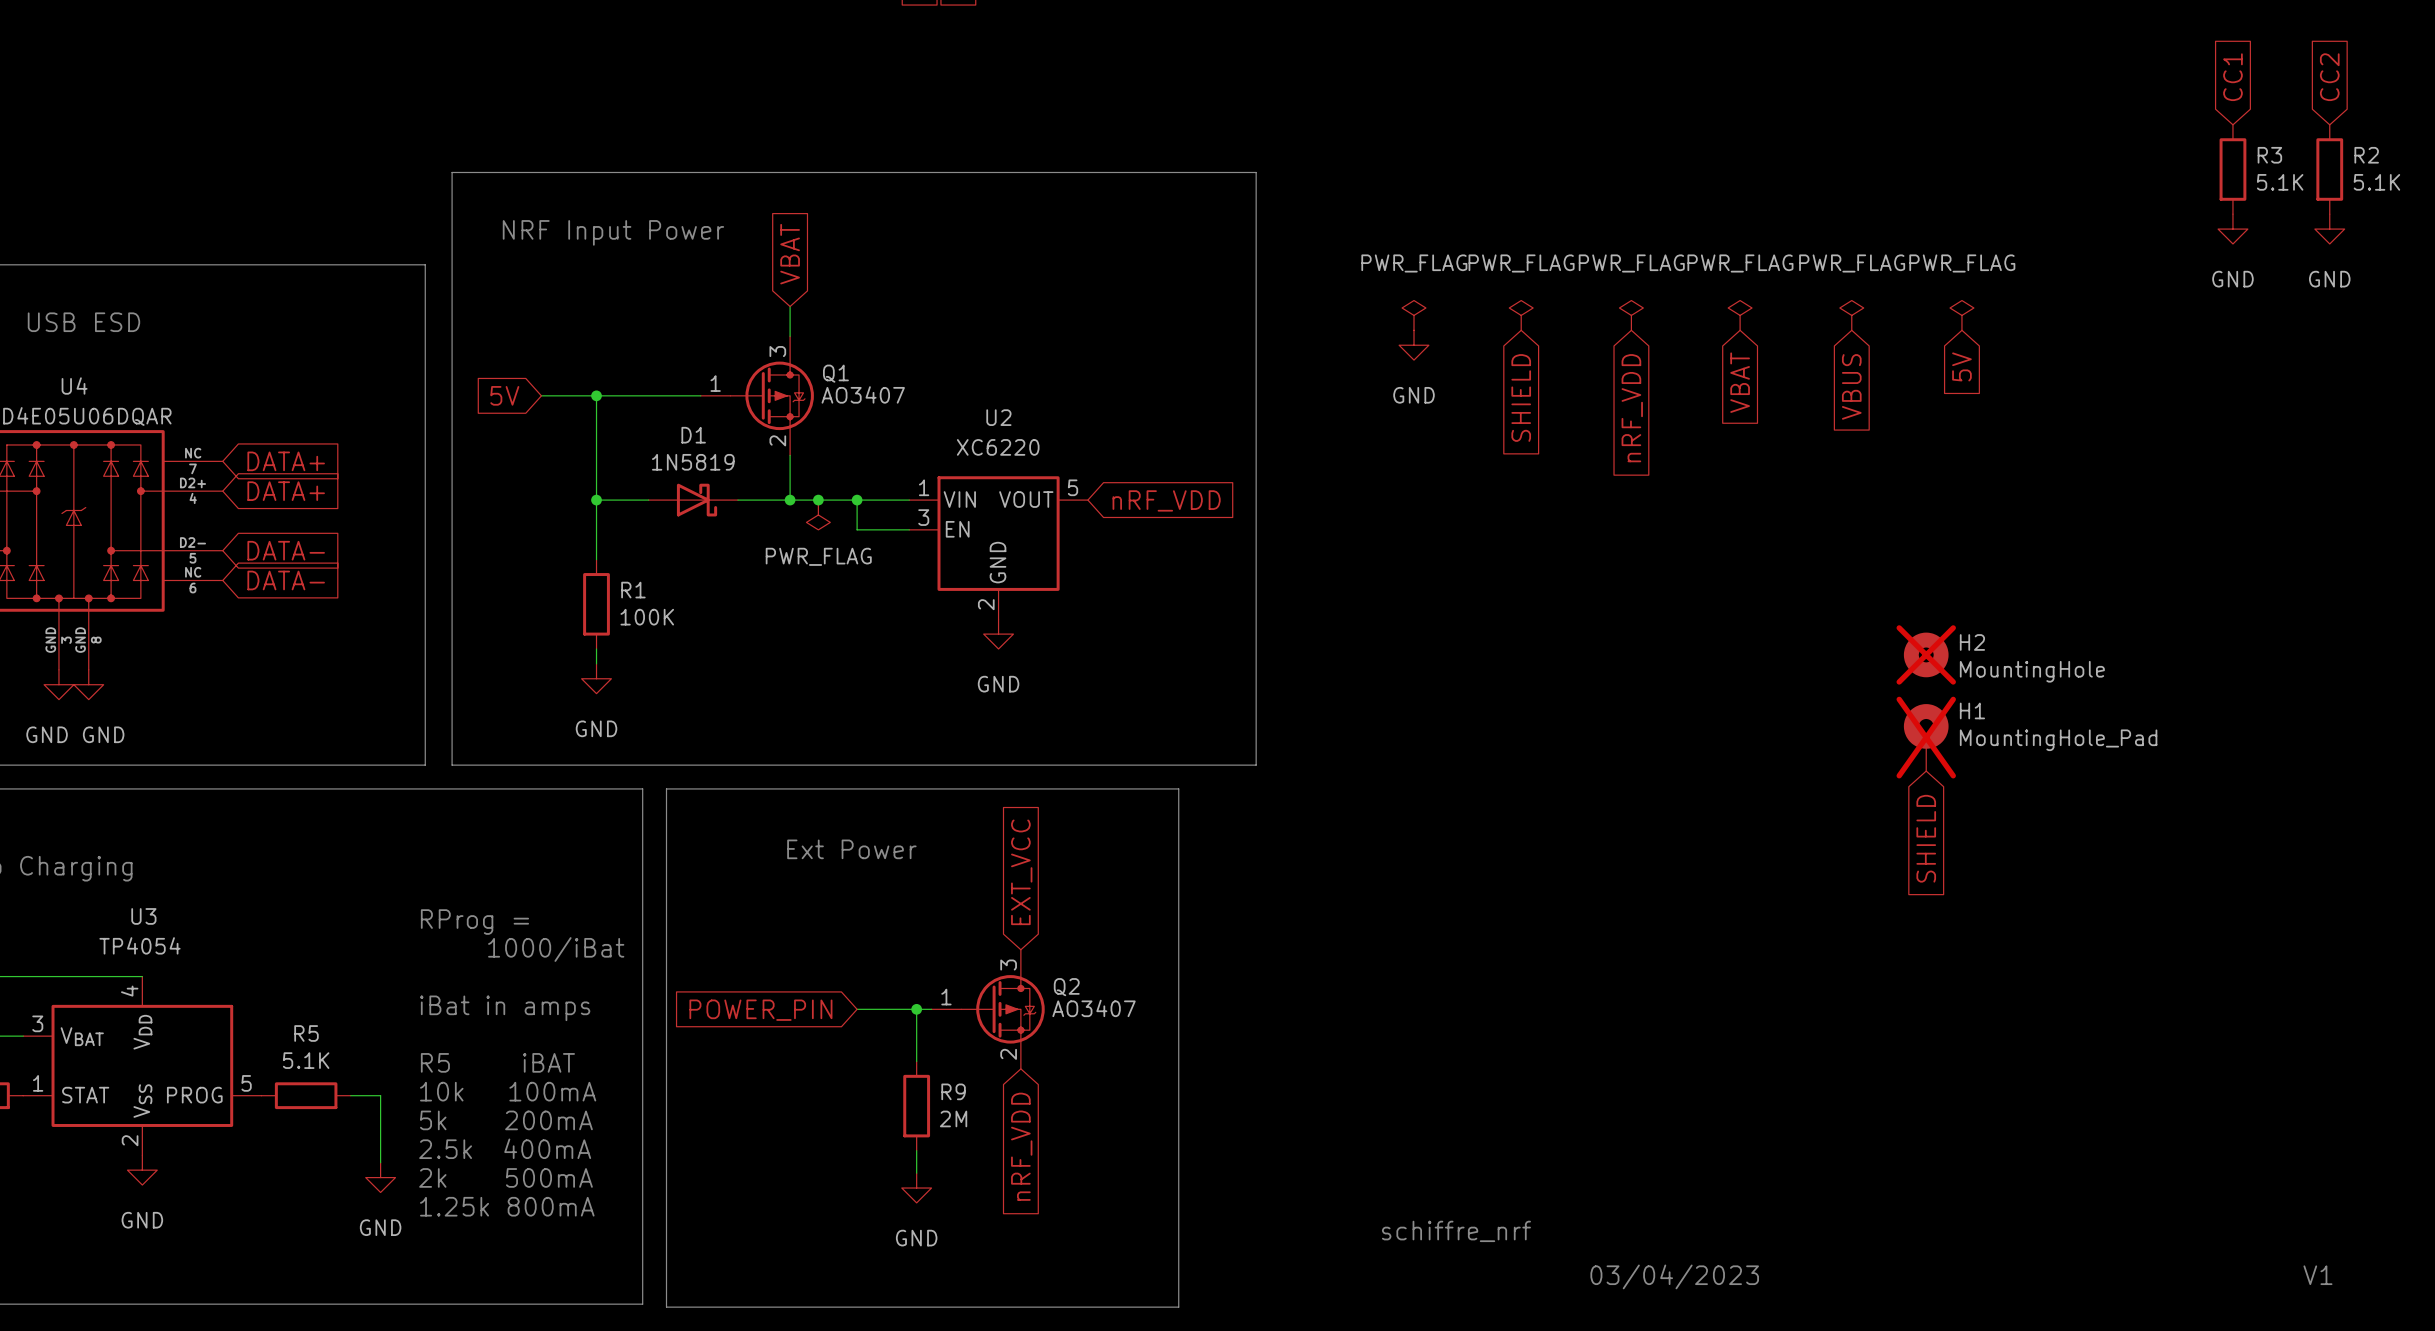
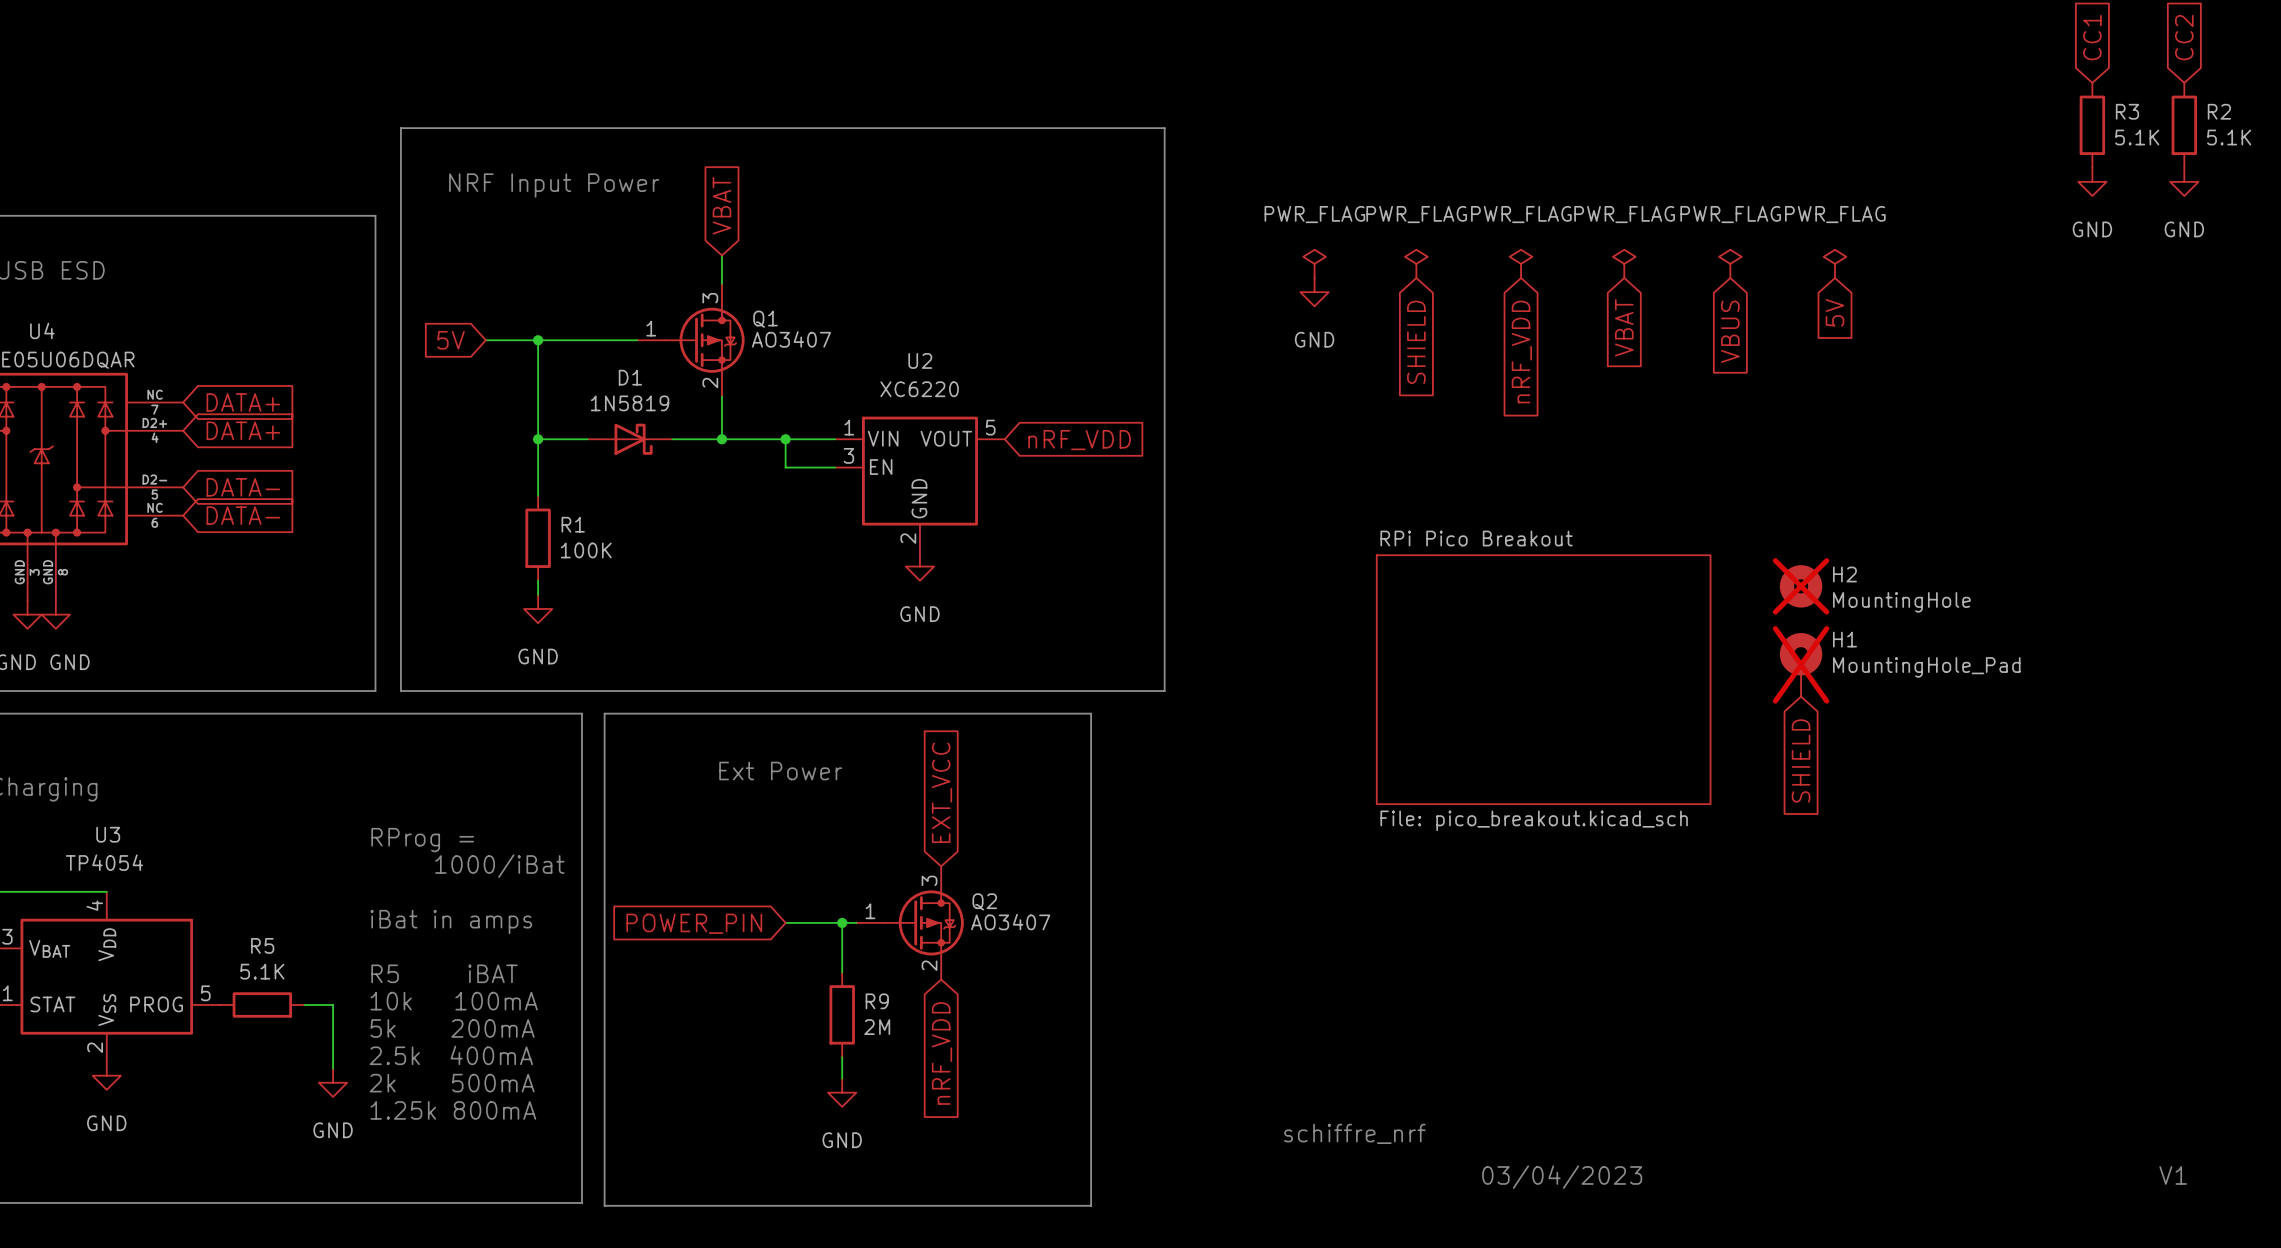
junction: (818, 500) -> none
power symbol: PWR_FLAG (818, 514) -> none
sheet RPi Pico Breakout: none -> File: pico_breakout.kicad_sch (1543, 679)

